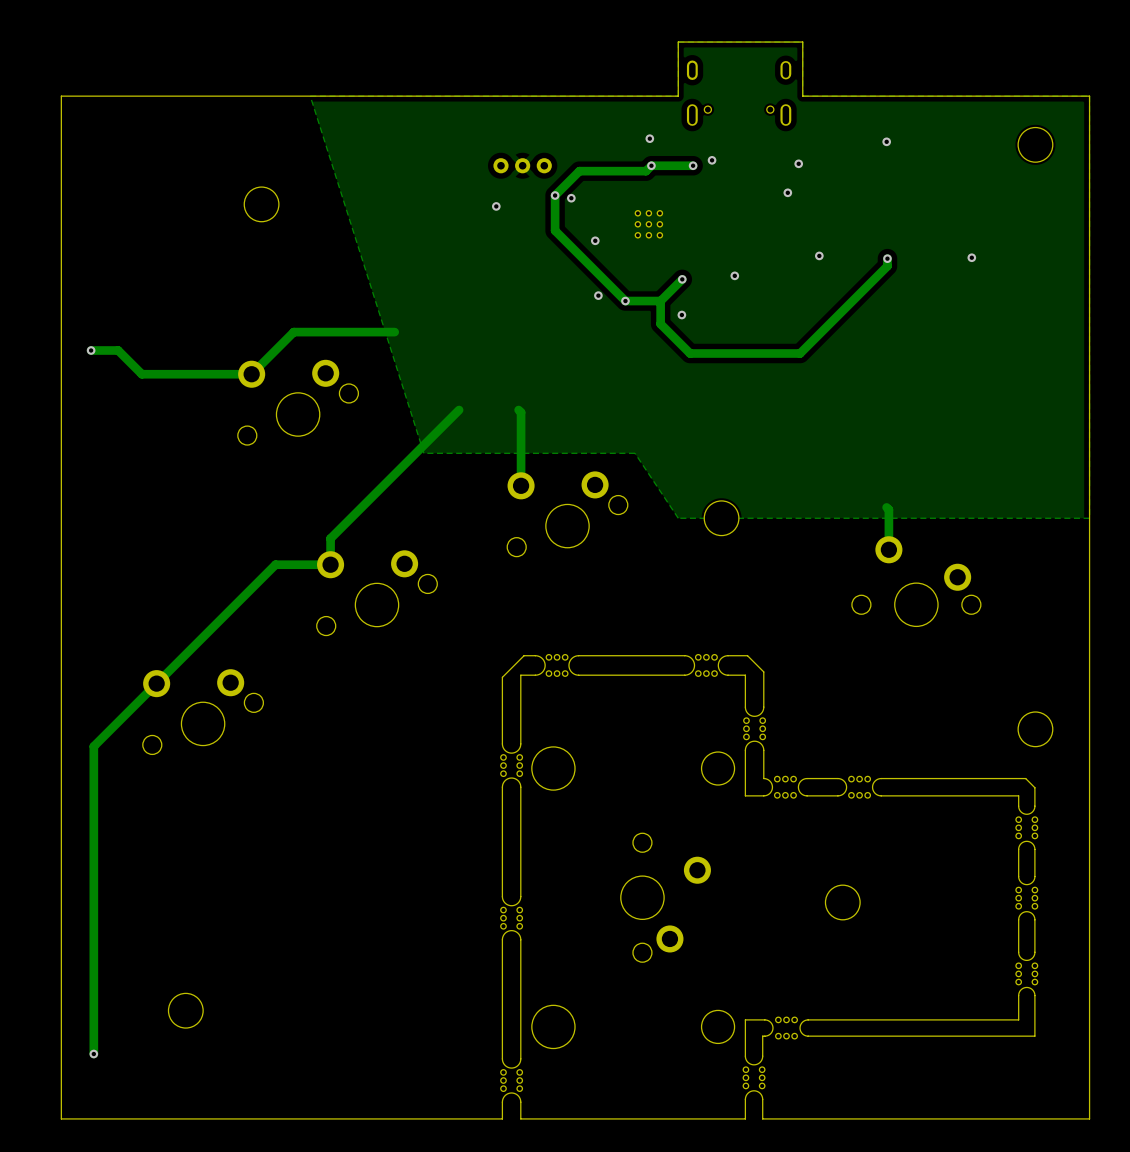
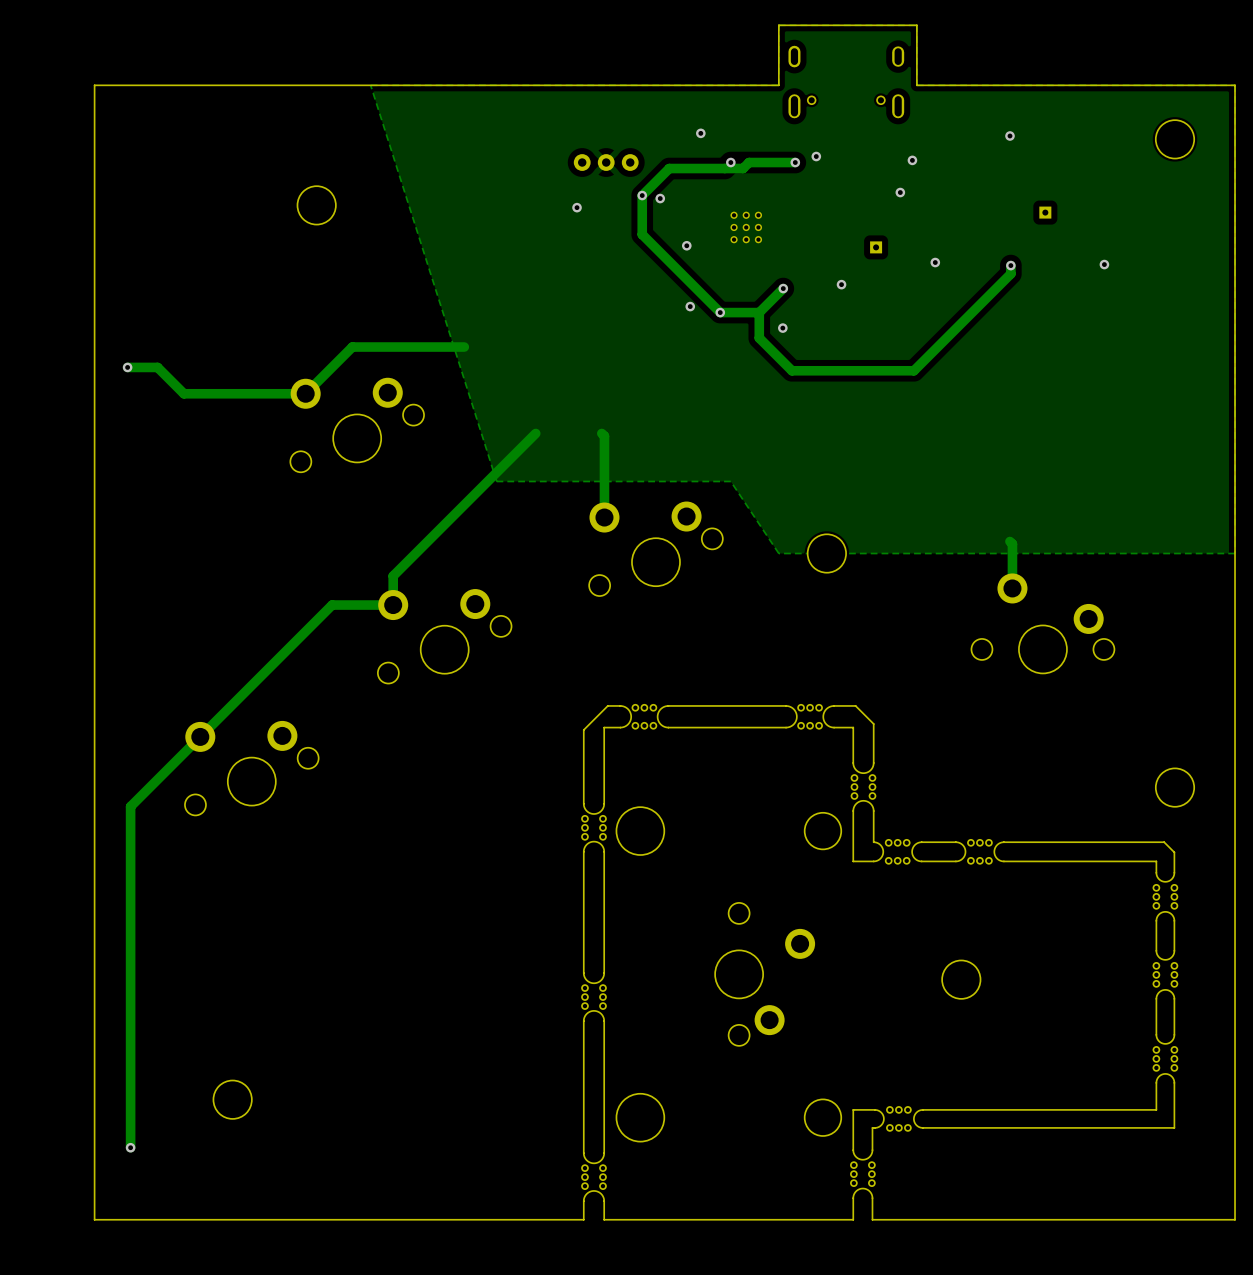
via: (649, 138) -> none
via: none -> (700, 133)
via: none -> (730, 162)
via: (651, 165) -> none
part: none -> (1045, 212)
part: none -> (876, 247)

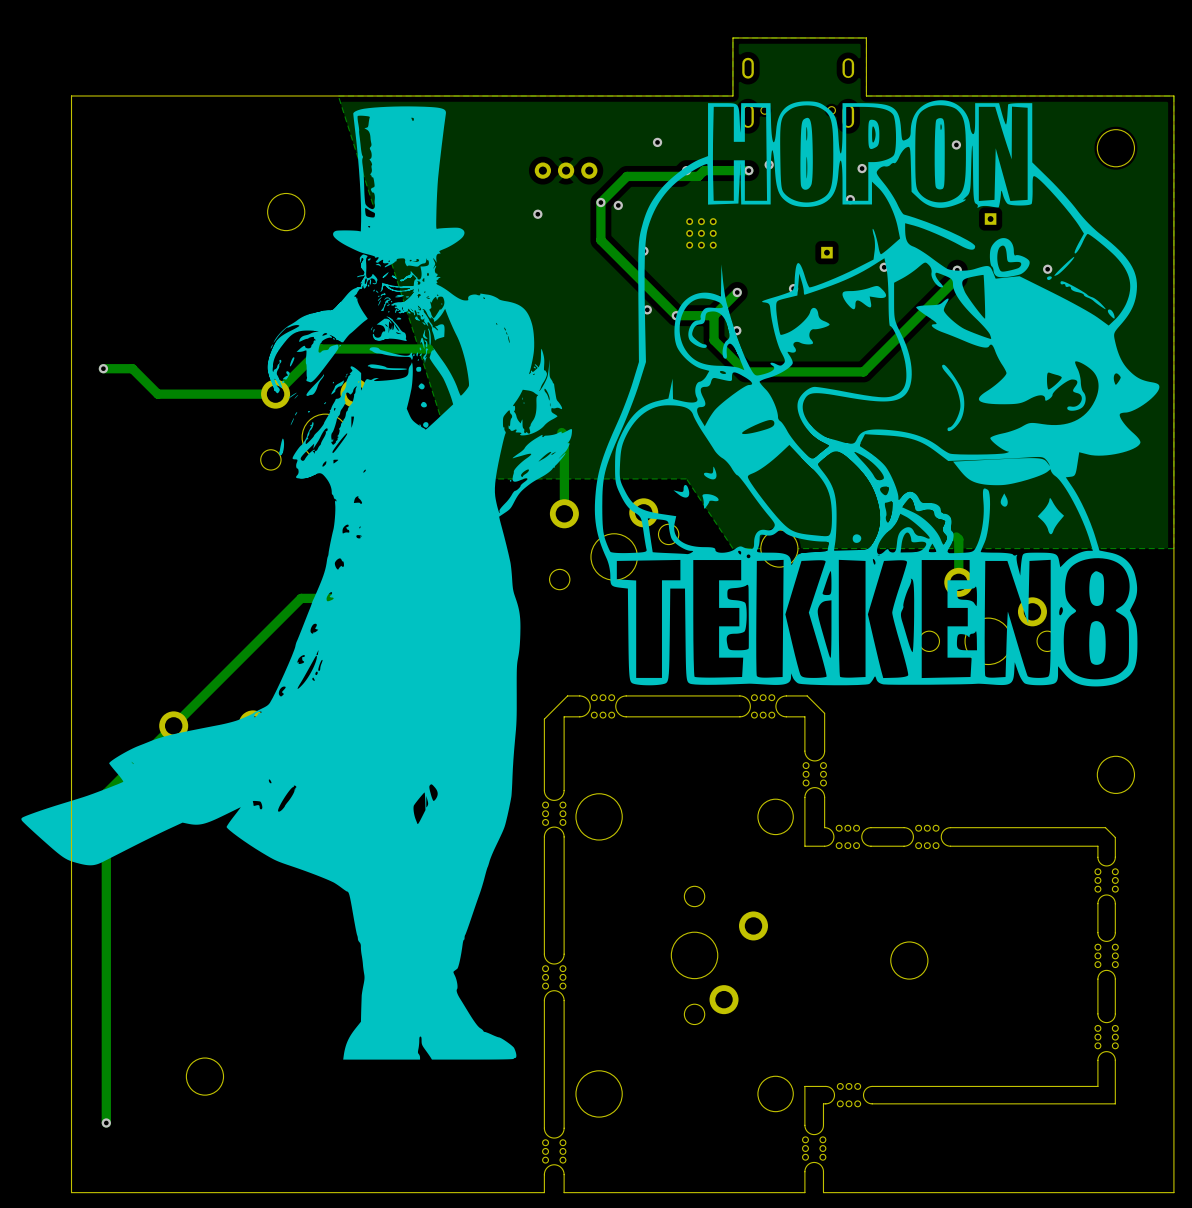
drawing: none -> [594, 100, 1160, 687]
drawing: none -> [21, 106, 573, 1060]

